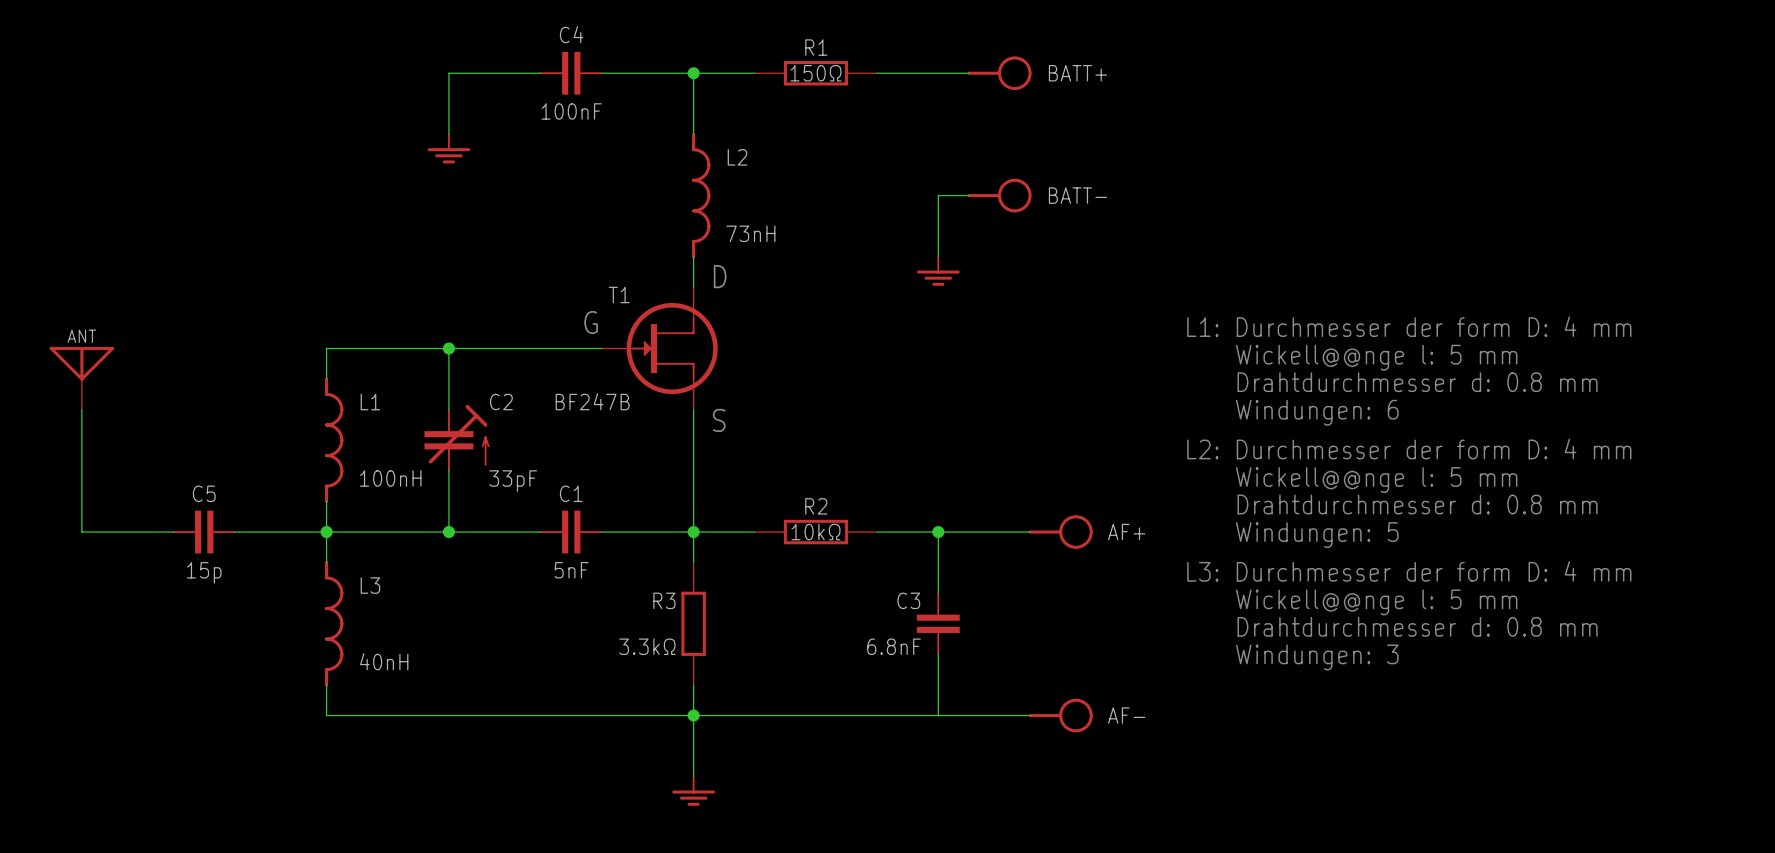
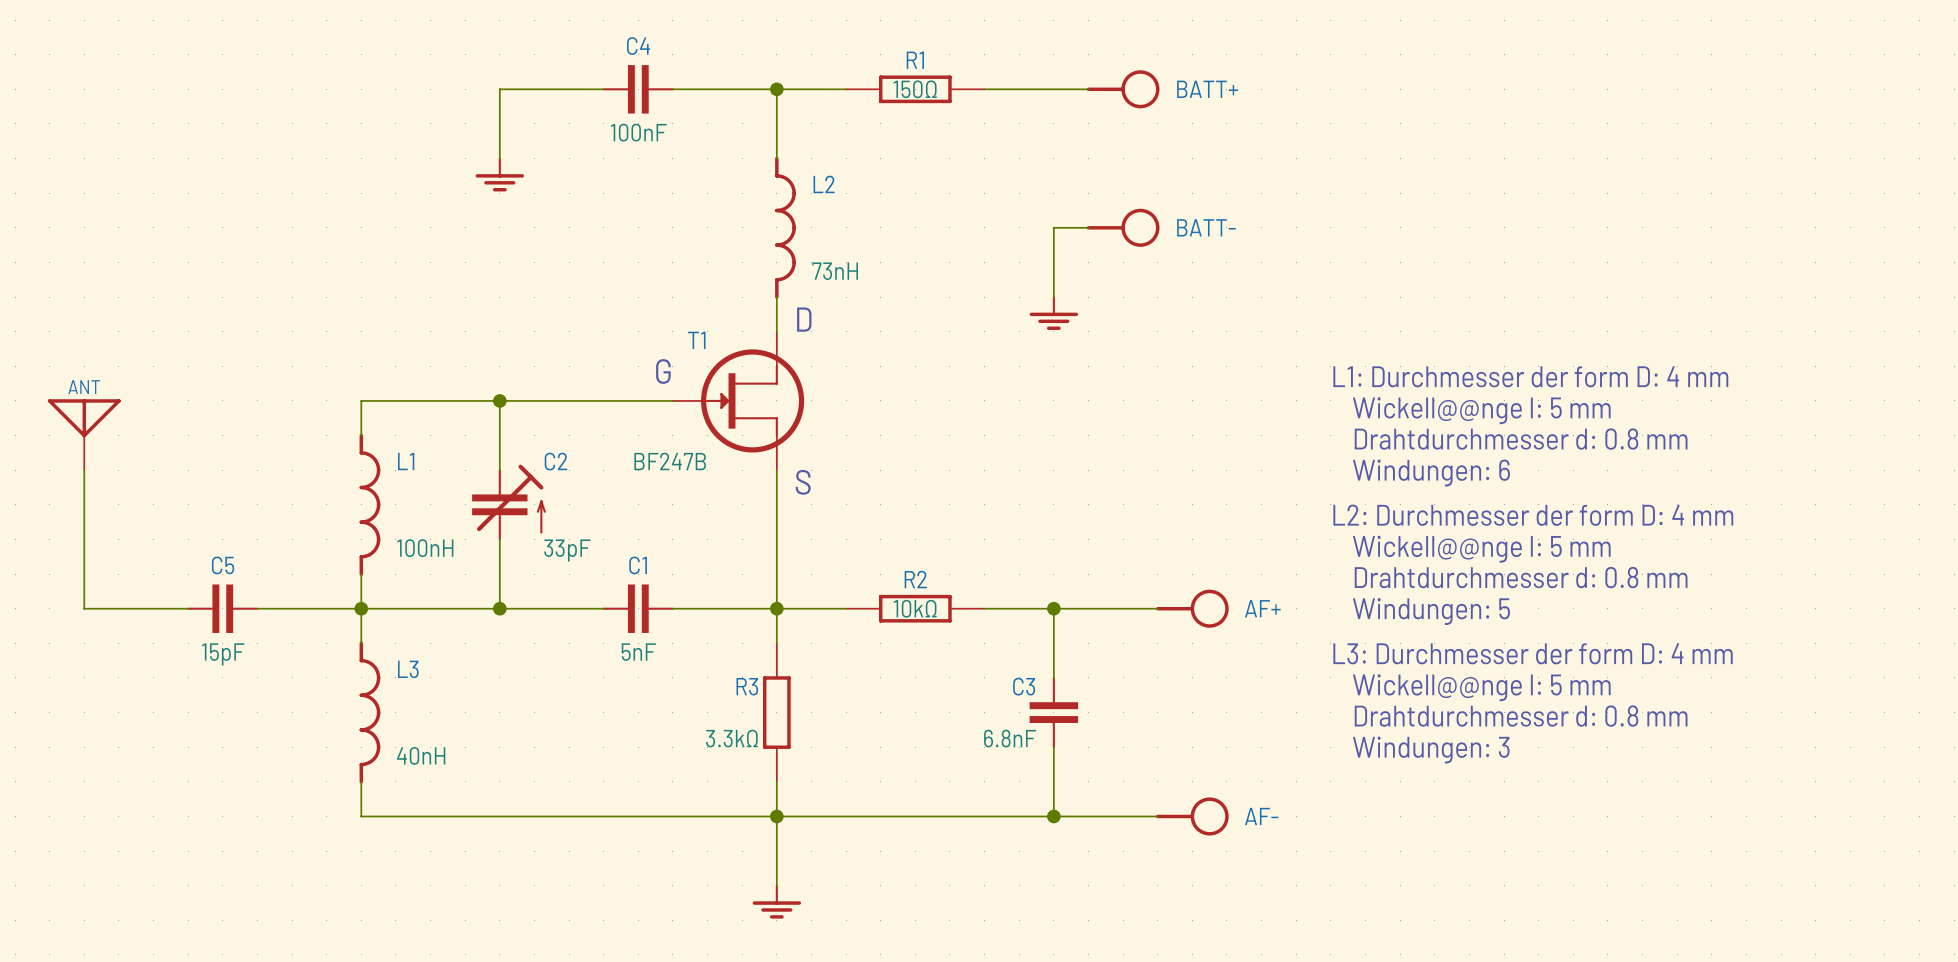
C5 value: 15p (204, 572) -> 15pF (223, 654)
junction: none -> (1053, 816)

